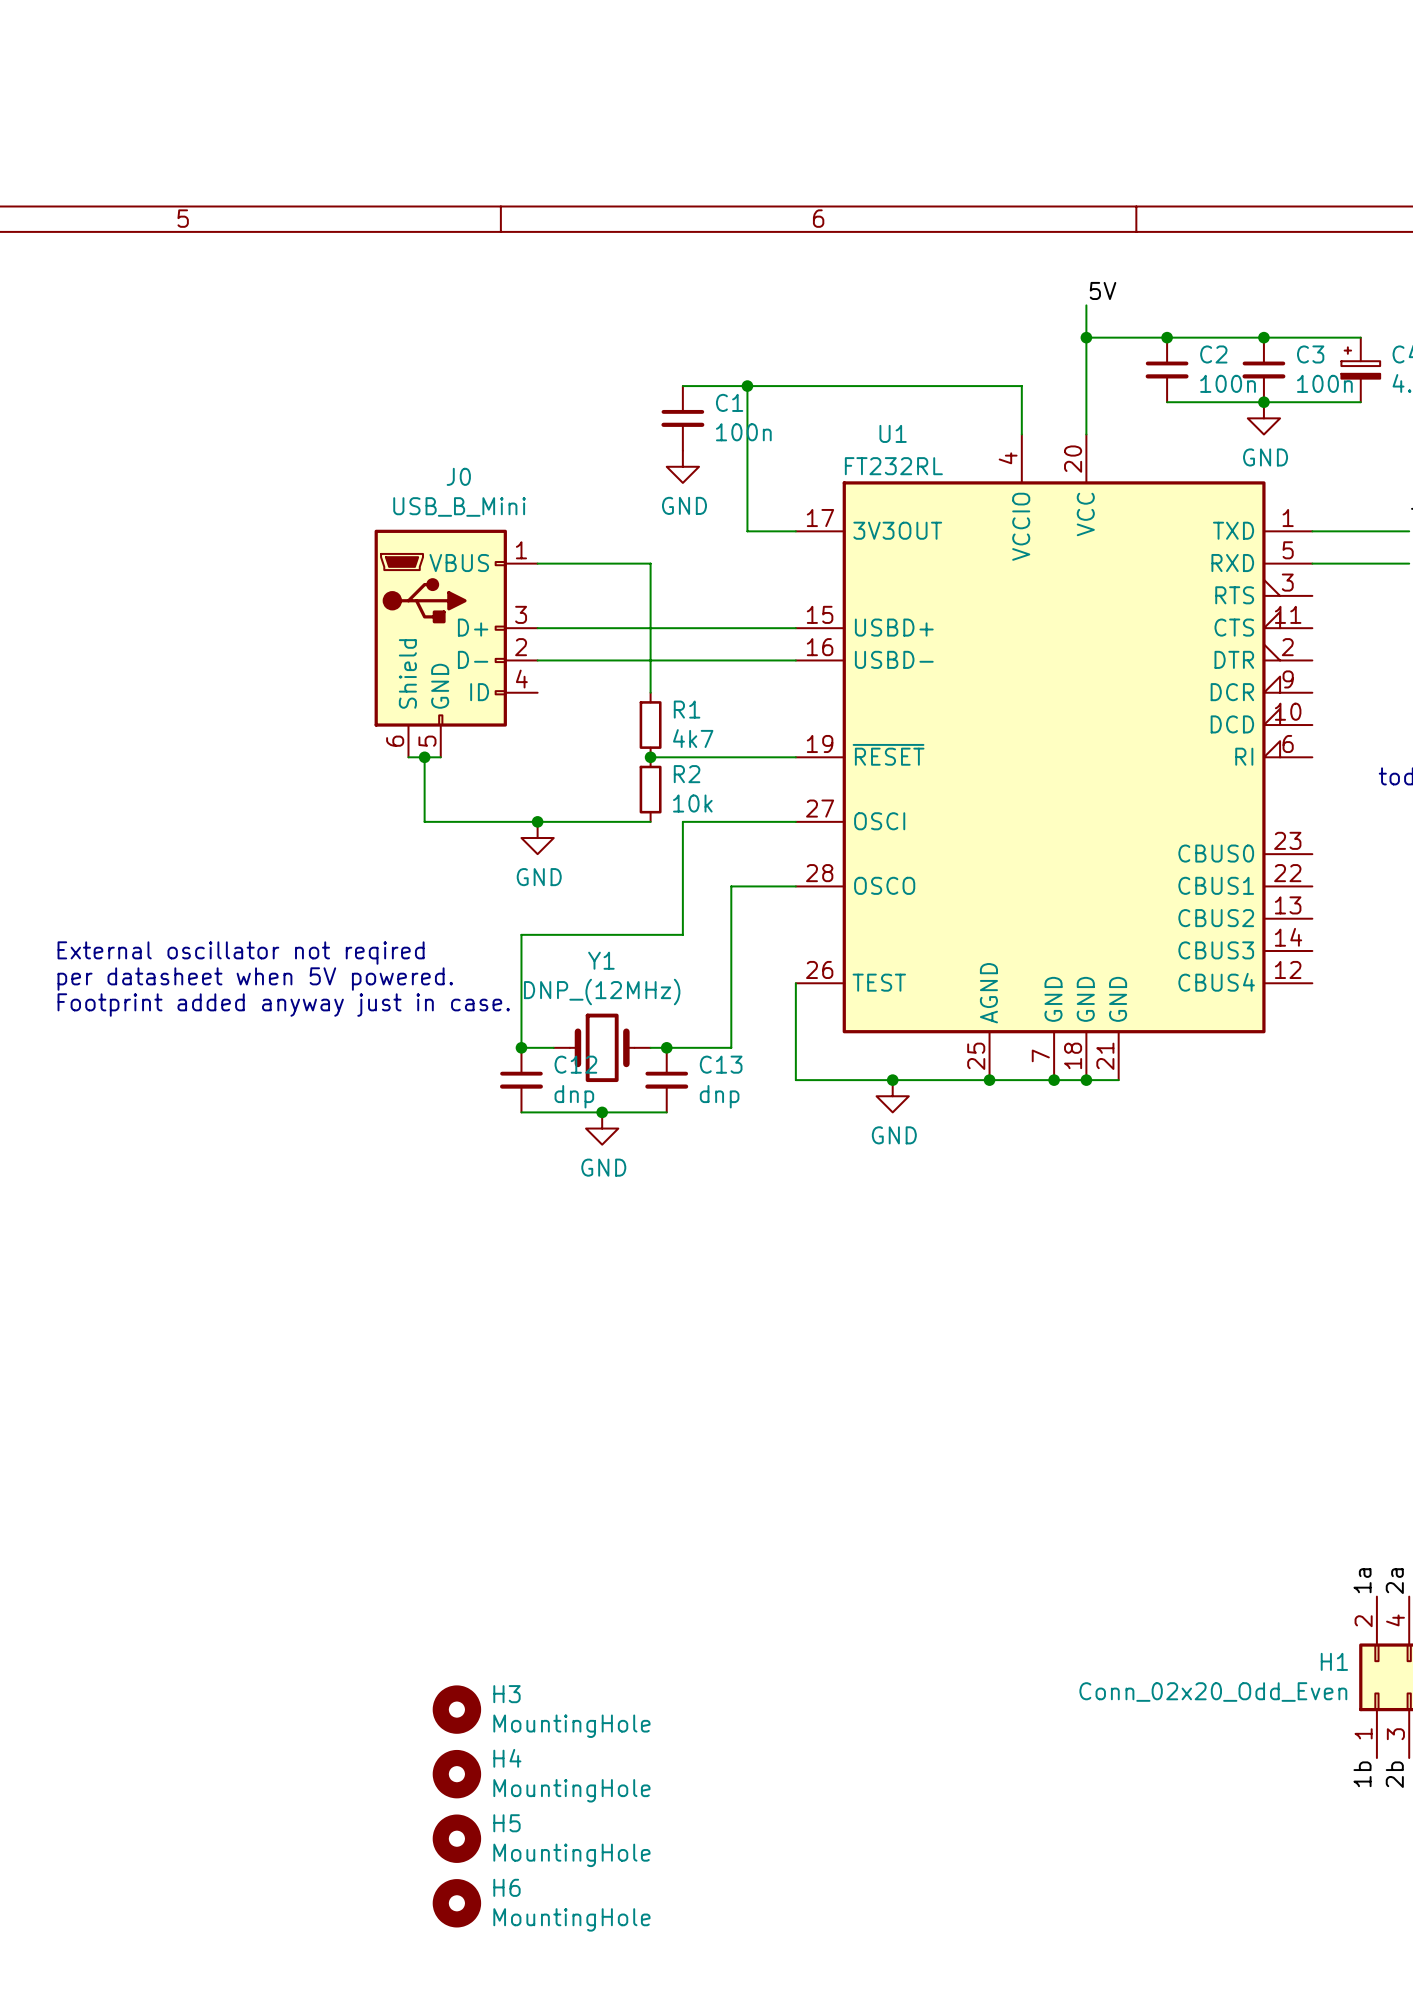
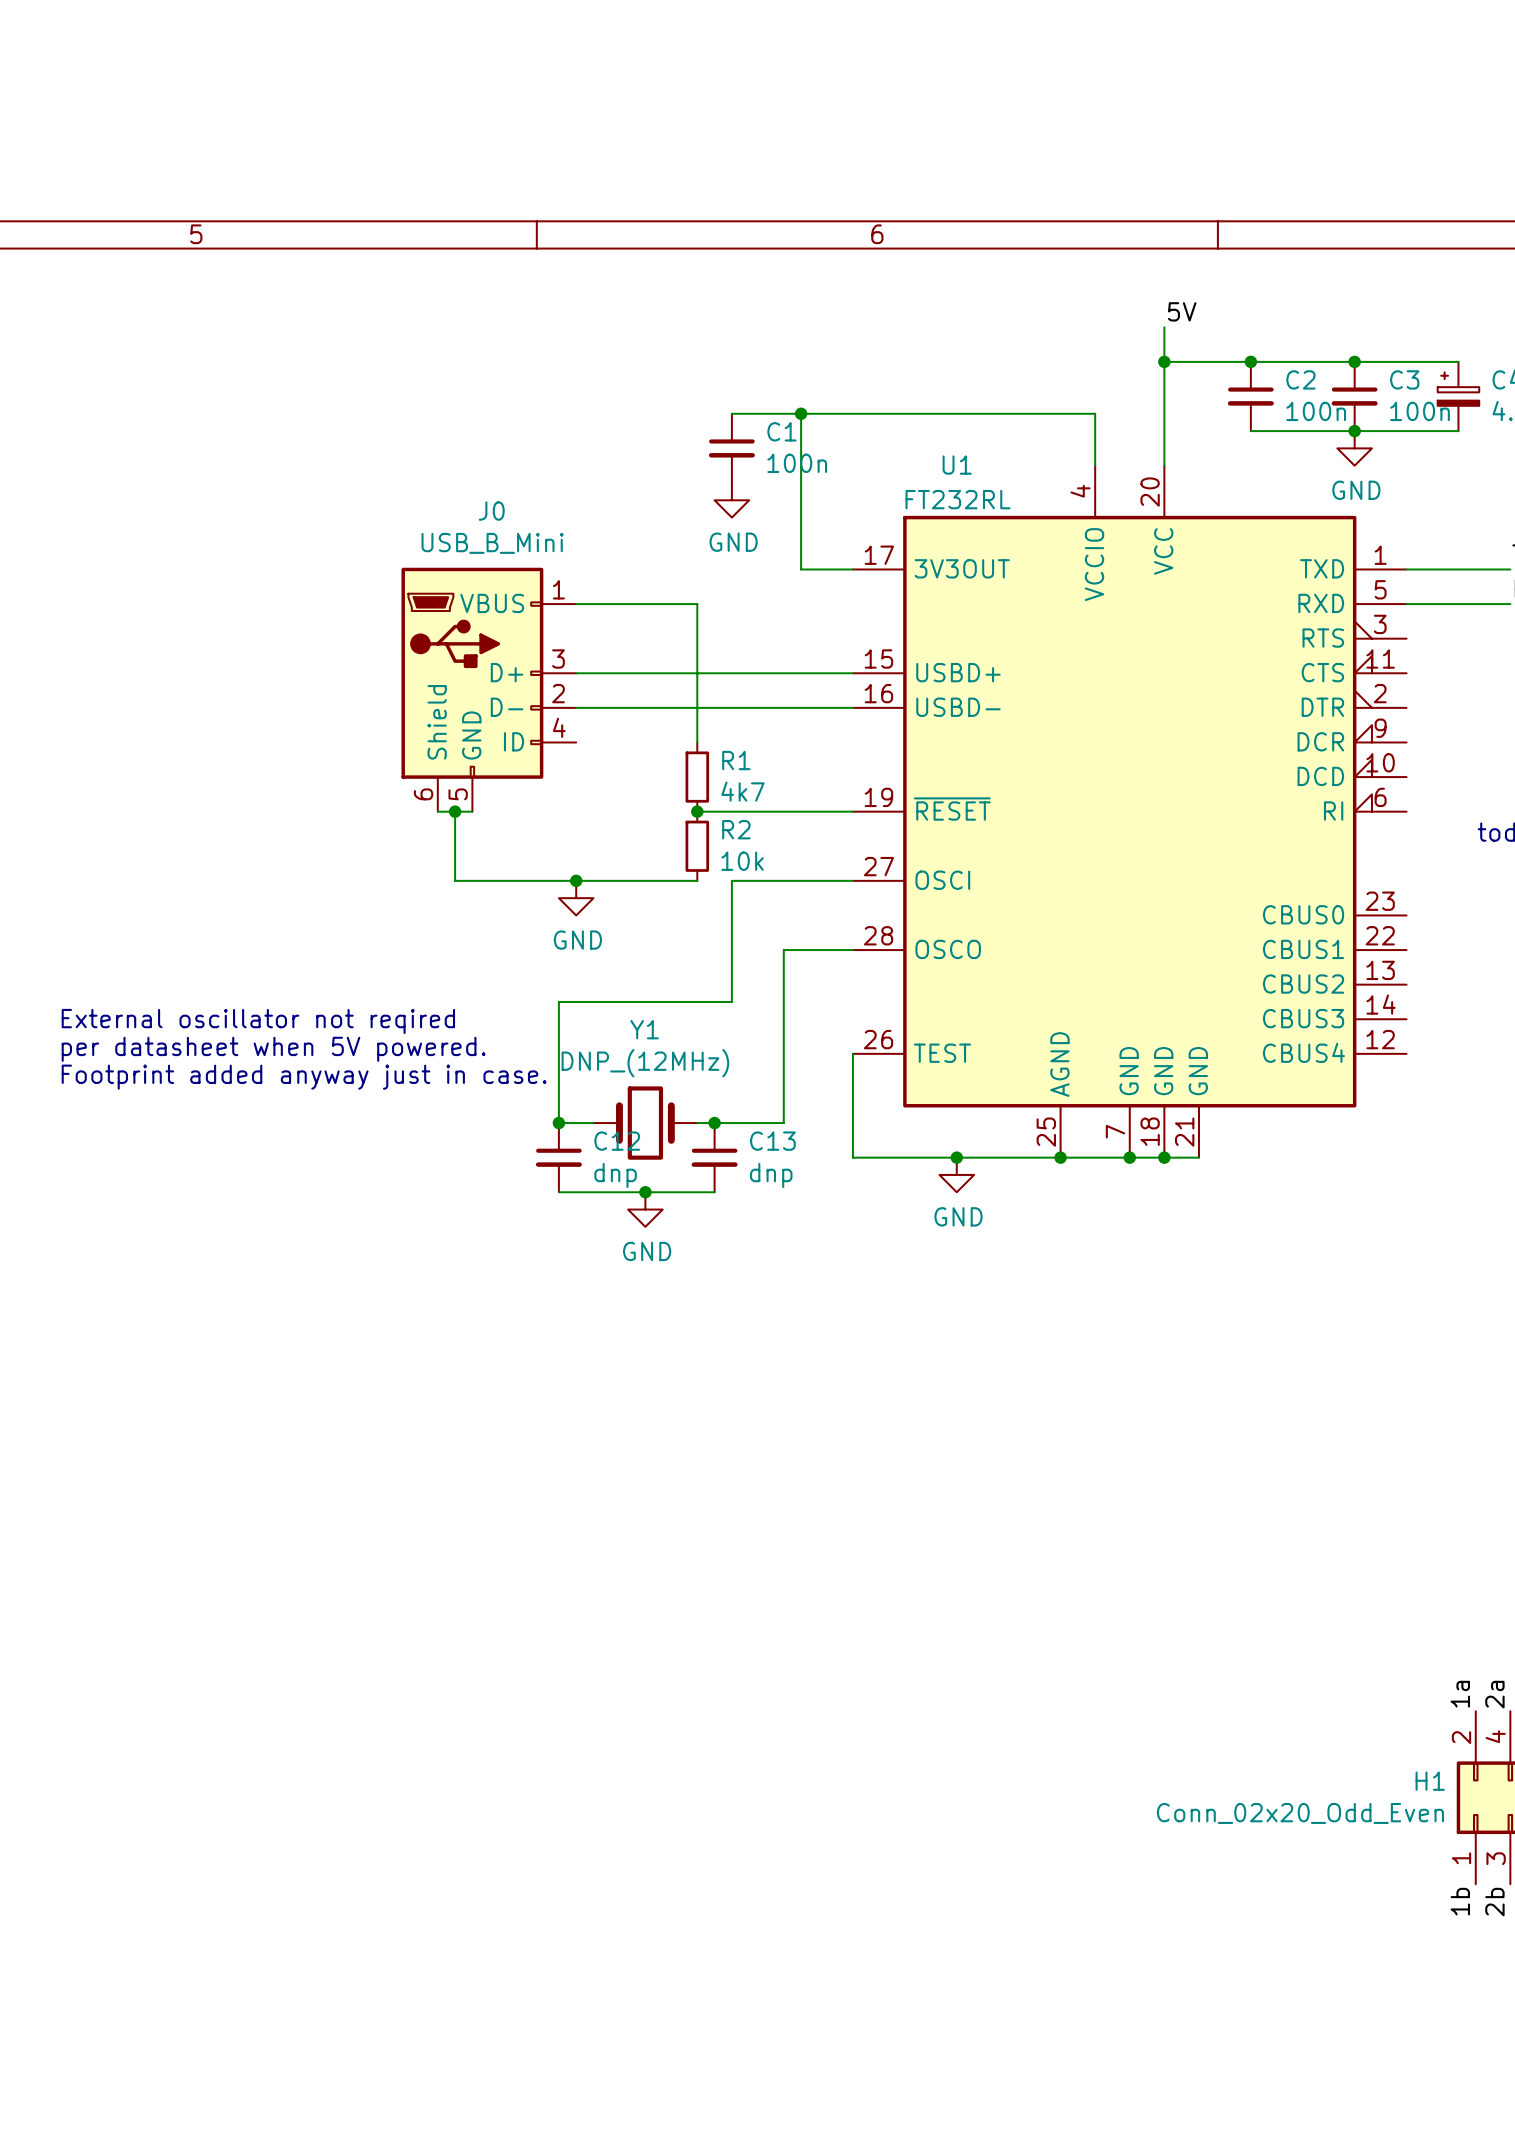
H3: MountingHole (456, 1709) -> none
H4: MountingHole (456, 1774) -> none
H5: MountingHole (456, 1838) -> none
H6: MountingHole (456, 1903) -> none

